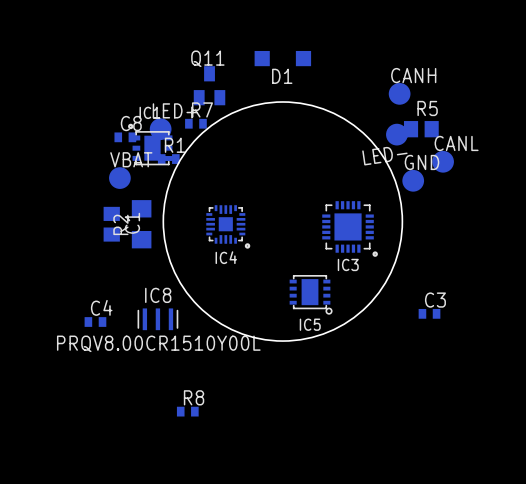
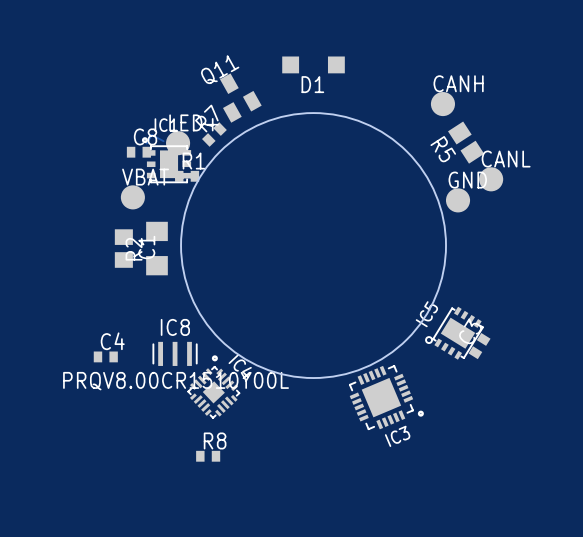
Q11 rotation: 0° (209, 85) -> 29.3° counterclockwise (240, 98)
R5 name position: R5 (427, 108) -> R5 (443, 149)
R7 rotation: 0° (195, 123) -> 44.2° counterclockwise (214, 134)
track: none -> (163, 141) (151, 135) (146, 143)
R5 rotation: 0° (421, 129) -> 57° clockwise (466, 142)
LED-: (396, 134) -> none
IC4 rotation: 0° (228, 226) -> 133.2° counterclockwise (213, 387)
IC4 position: (228, 226) -> (213, 387)
IC3 rotation: 0° (350, 228) -> 22.9° counterclockwise (386, 397)
IC3 position: (350, 228) -> (386, 397)
IC5 rotation: 0° (311, 294) -> 121.7° clockwise (454, 333)
IC5 position: (311, 294) -> (454, 333)
C3 rotation: 0° (429, 313) -> 58.1° counterclockwise (479, 346)

